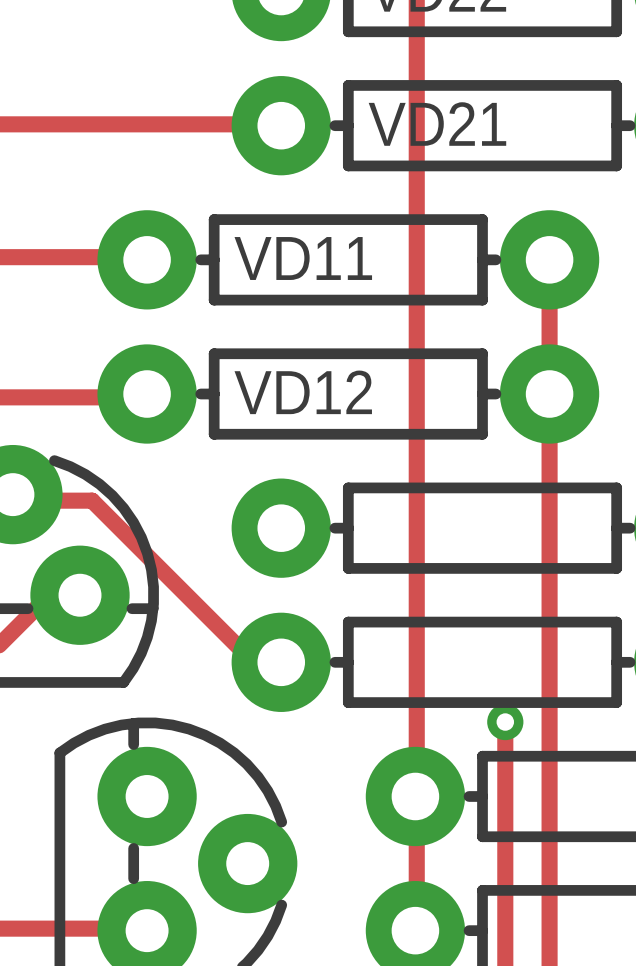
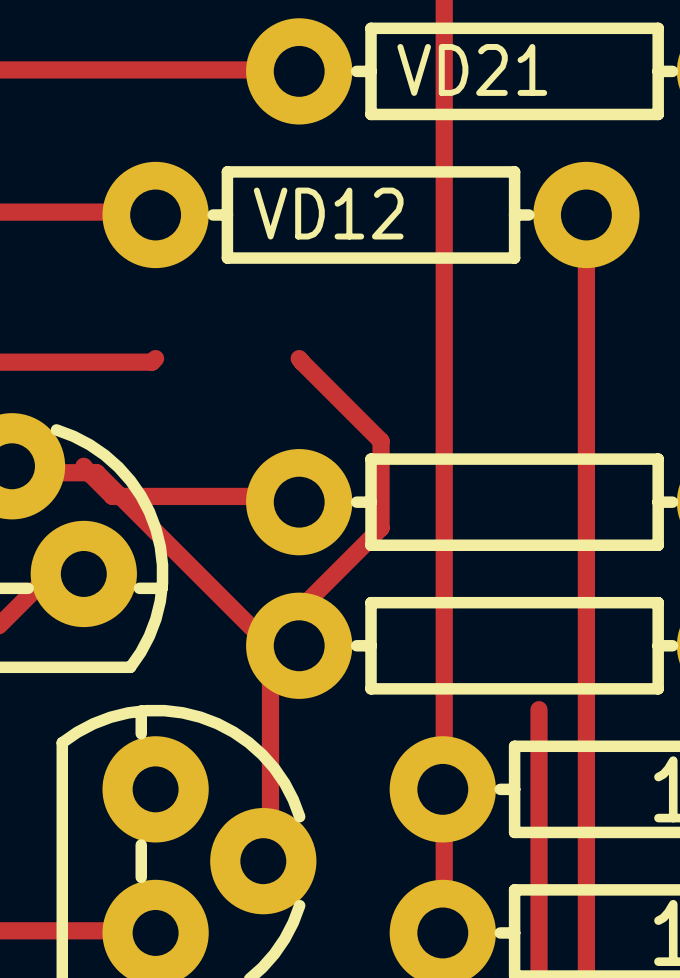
text: VD11 (303, 258) -> VD12 (328, 213)
text: VD12 (303, 392) -> none
track: none -> (299, 358) (381, 441) (381, 528) (270, 638) (270, 859) (263, 861)
part: (348, 394) -> none
track: none -> (83, 466) (112, 496) (294, 496) (299, 502)
via: (505, 722) -> none

